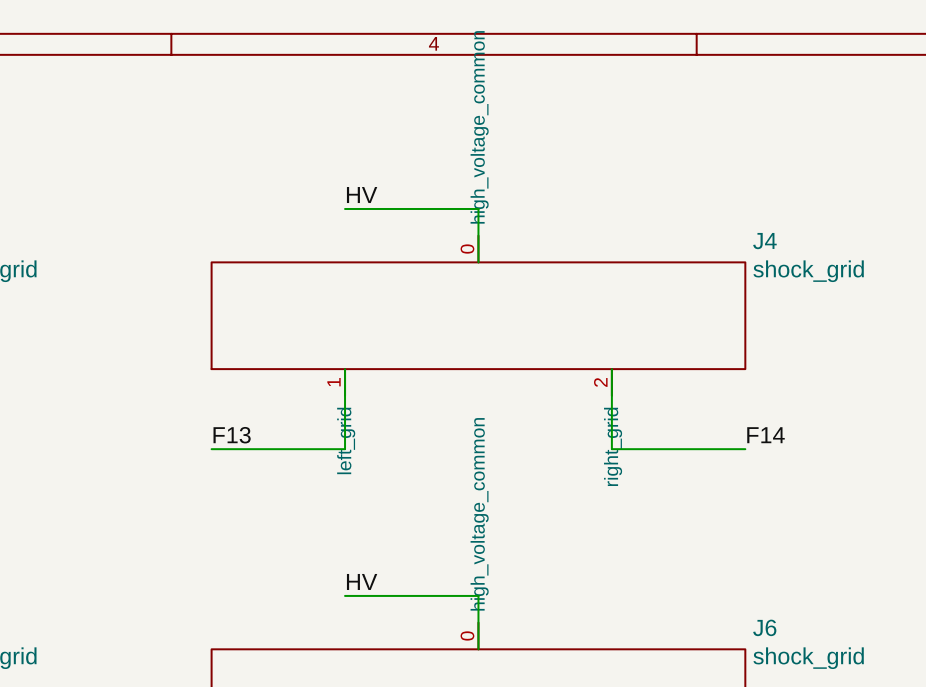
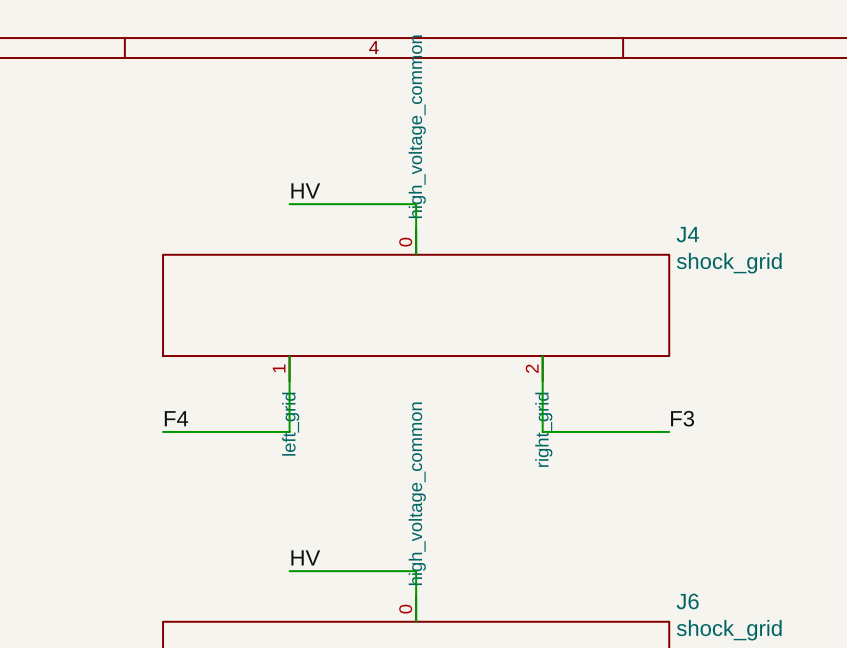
label: F13 (232, 435) -> F4 (176, 418)
label: F14 (765, 435) -> F3 (682, 418)

